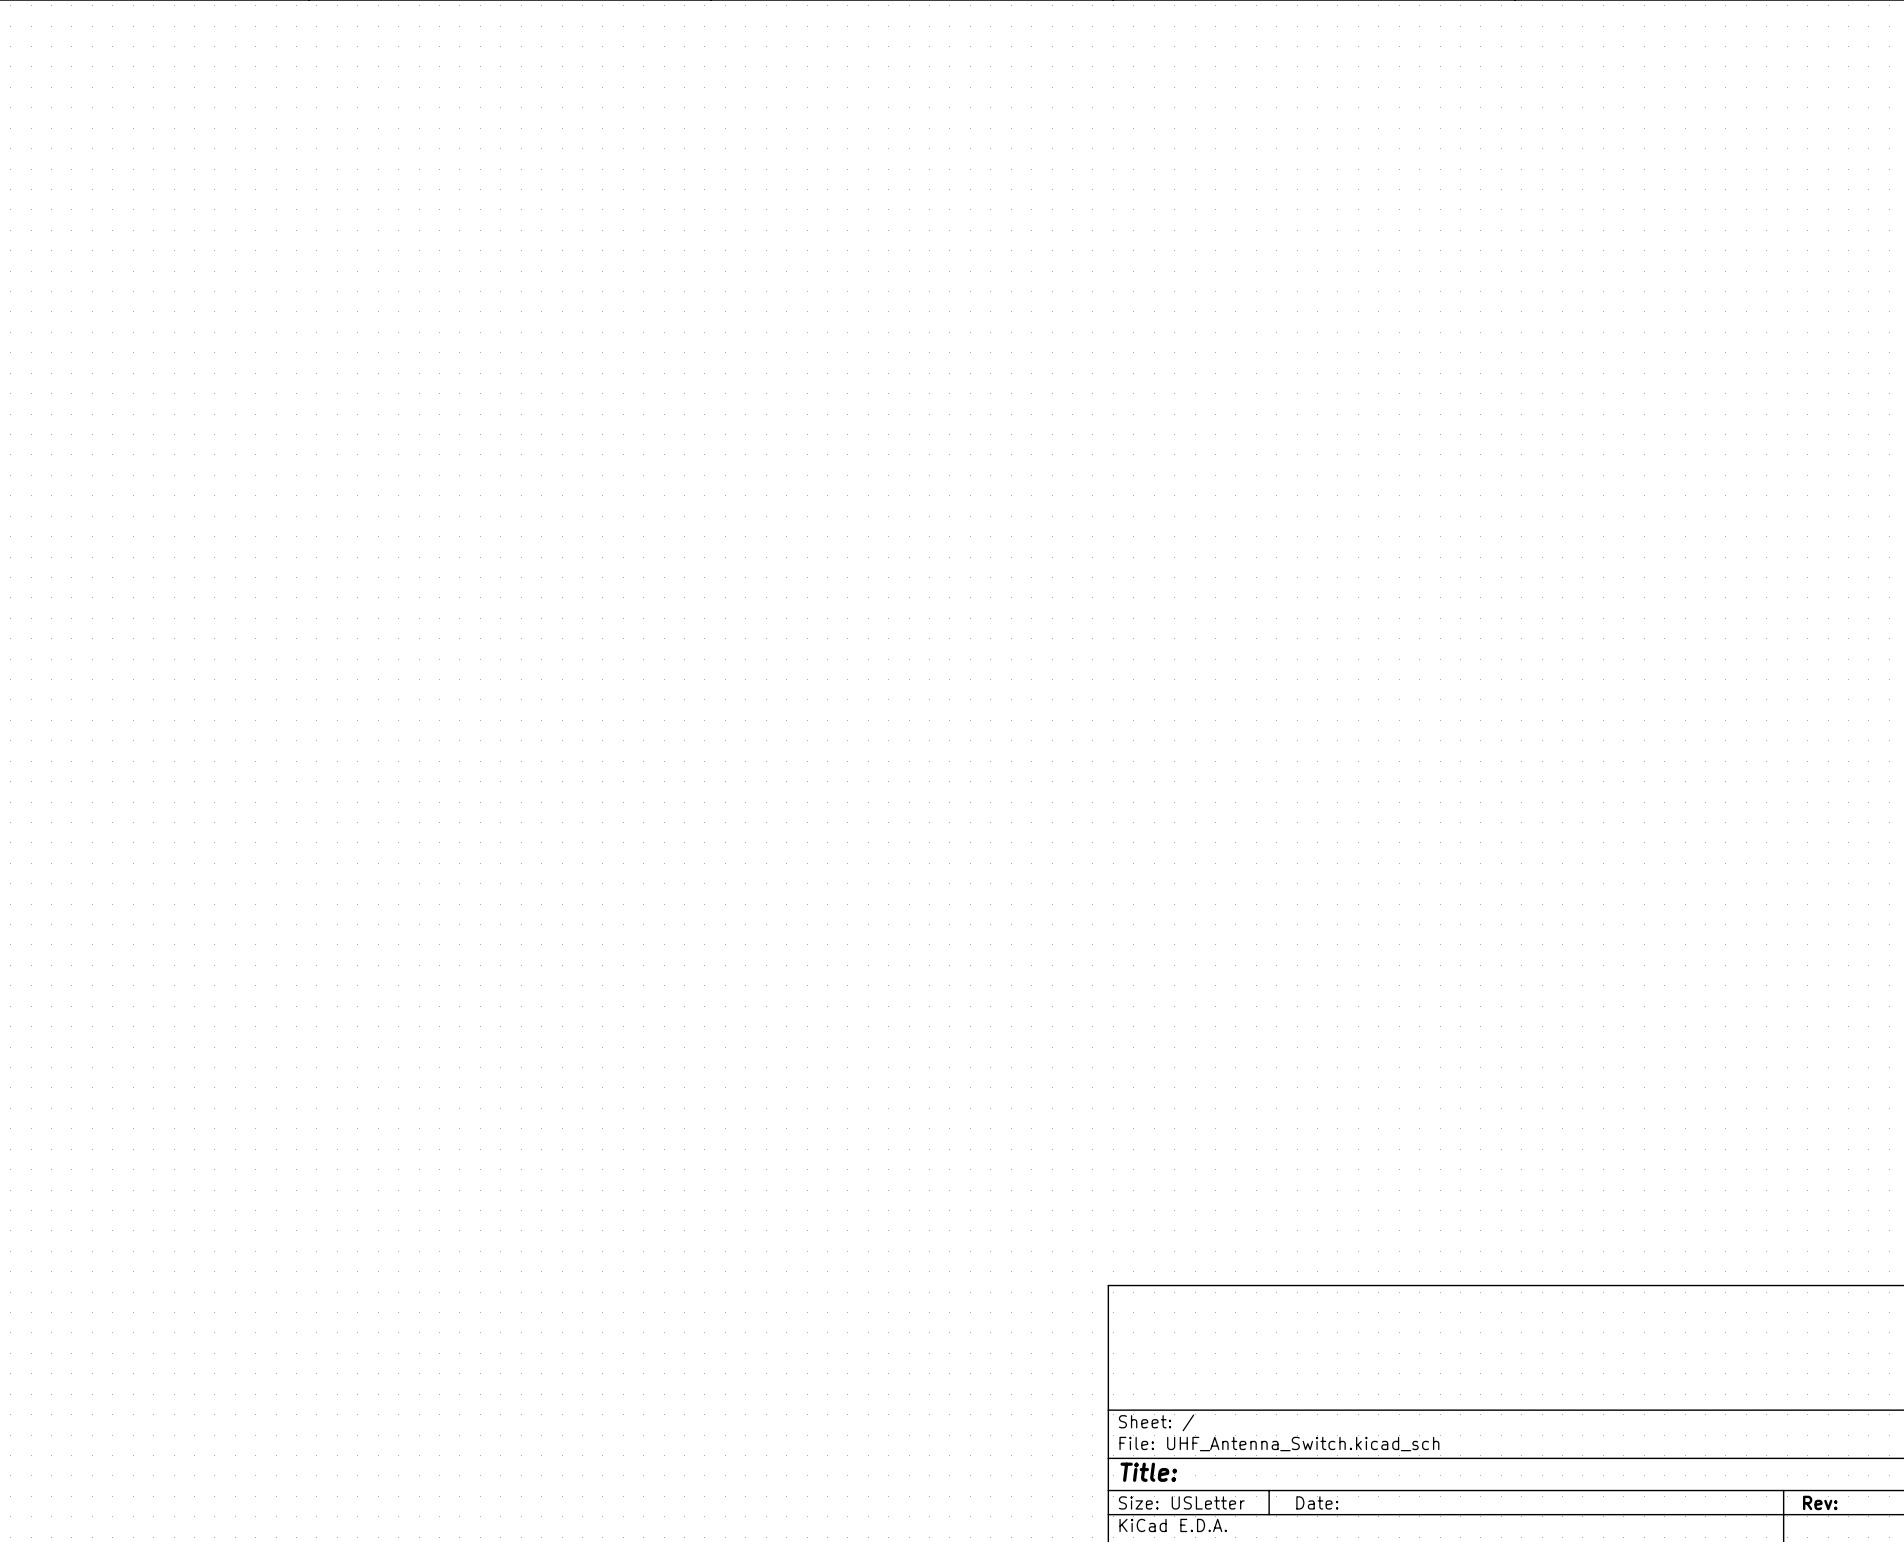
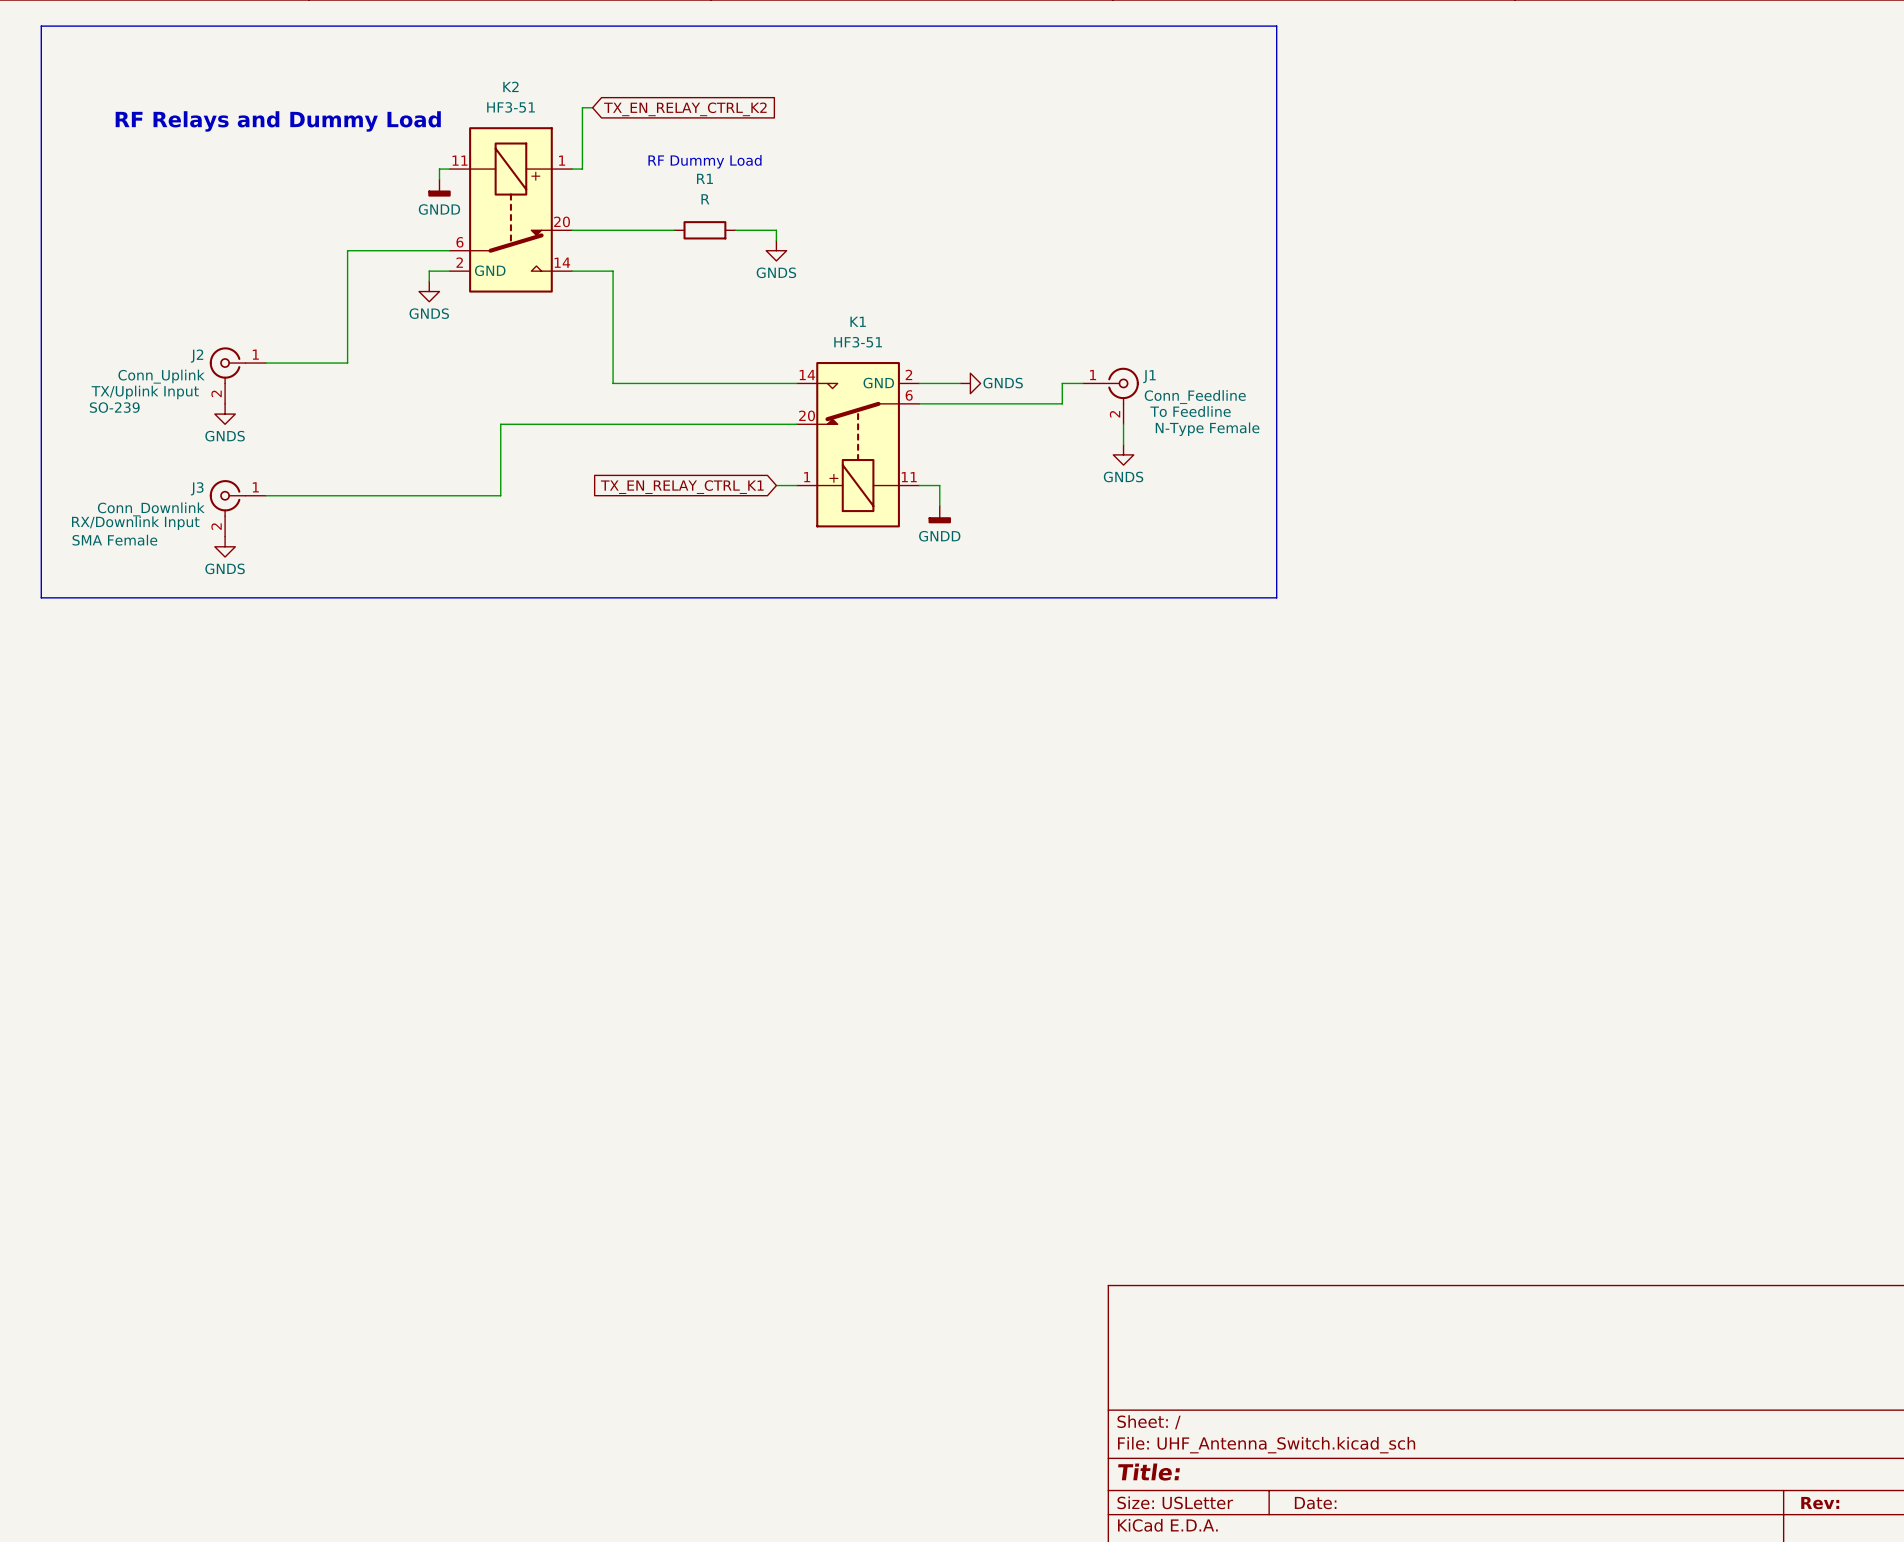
line: none -> (41, 26) (1276, 26) (1276, 597) (41, 597) (41, 26)
wire: none -> (592, 107) (582, 107) (582, 169) (572, 169)
global label: none -> TX_EN_RELAY_CTRL_K2 (685, 109)
text: none -> RF Relays and Dummy Load (278, 121)
text: none -> RF Dummy Load (704, 161)
wire: none -> (449, 169) (439, 169) (439, 179)
power symbol: none -> GNDD (439, 187)
K2: none -> HF3-51 (510, 209)
wire: none -> (572, 230) (674, 230)
R1: none -> R (704, 230)
wire: none -> (735, 230) (776, 230) (776, 240)
wire: none -> (449, 250) (347, 250) (347, 363) (265, 363)
power symbol: none -> GNDS (776, 250)
wire: none -> (449, 271) (429, 271) (429, 281)
wire: none -> (572, 271) (613, 271) (613, 383) (796, 383)
power symbol: none -> GNDS (429, 291)
J2: none -> Conn_Uplink (237, 375)
wire: none -> (919, 383) (960, 383)
power symbol: none -> GNDS (970, 383)
wire: none -> (1082, 383) (1062, 383) (1062, 403) (919, 403)
J1: none -> Conn_Feedline (1110, 396)
power symbol: none -> GNDS (225, 414)
wire: none -> (796, 424) (500, 424) (500, 495) (265, 495)
wire: none -> (1123, 424) (1123, 444)
K1: none -> HF3-51 (858, 444)
power symbol: none -> GNDS (1123, 454)
wire: none -> (776, 485) (796, 485)
wire: none -> (919, 485) (939, 485) (939, 505)
global label: none -> TX_EN_RELAY_CTRL_K1 (682, 487)
J3: none -> Conn_Downlink (237, 508)
power symbol: none -> GNDD (939, 514)
power symbol: none -> GNDS (225, 546)

